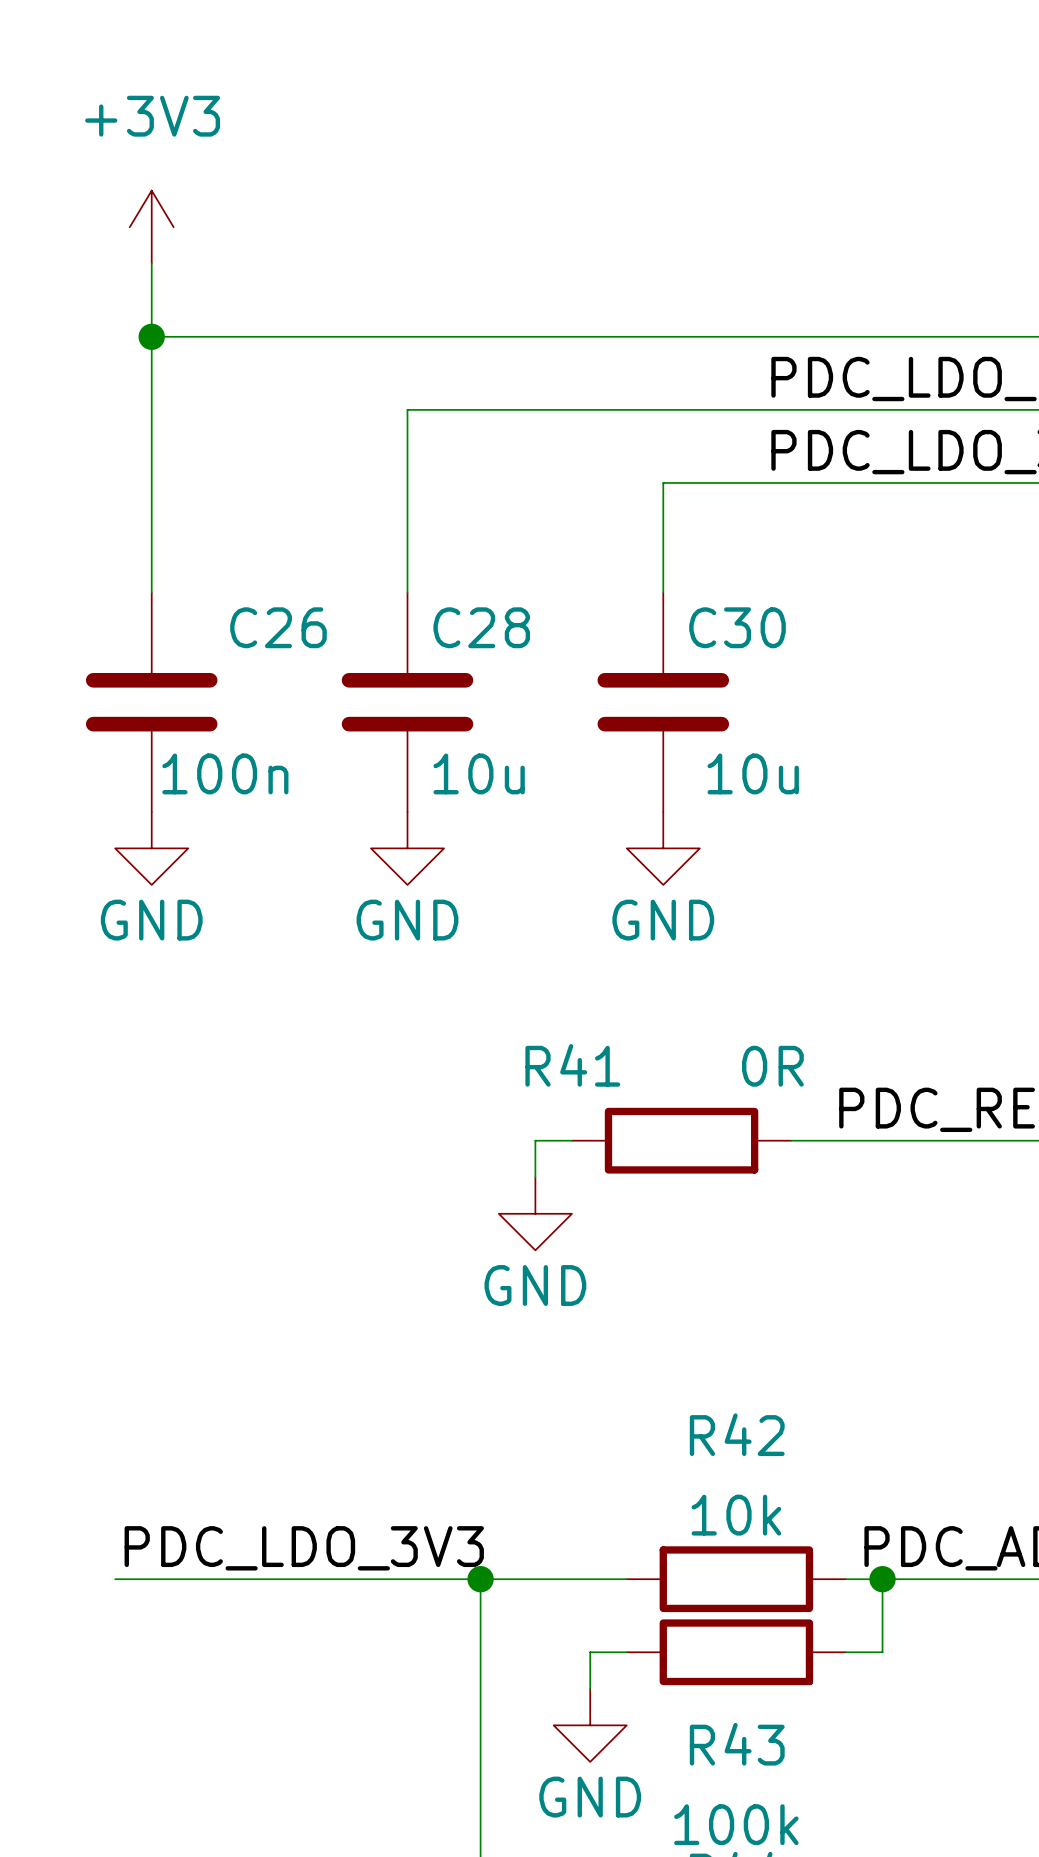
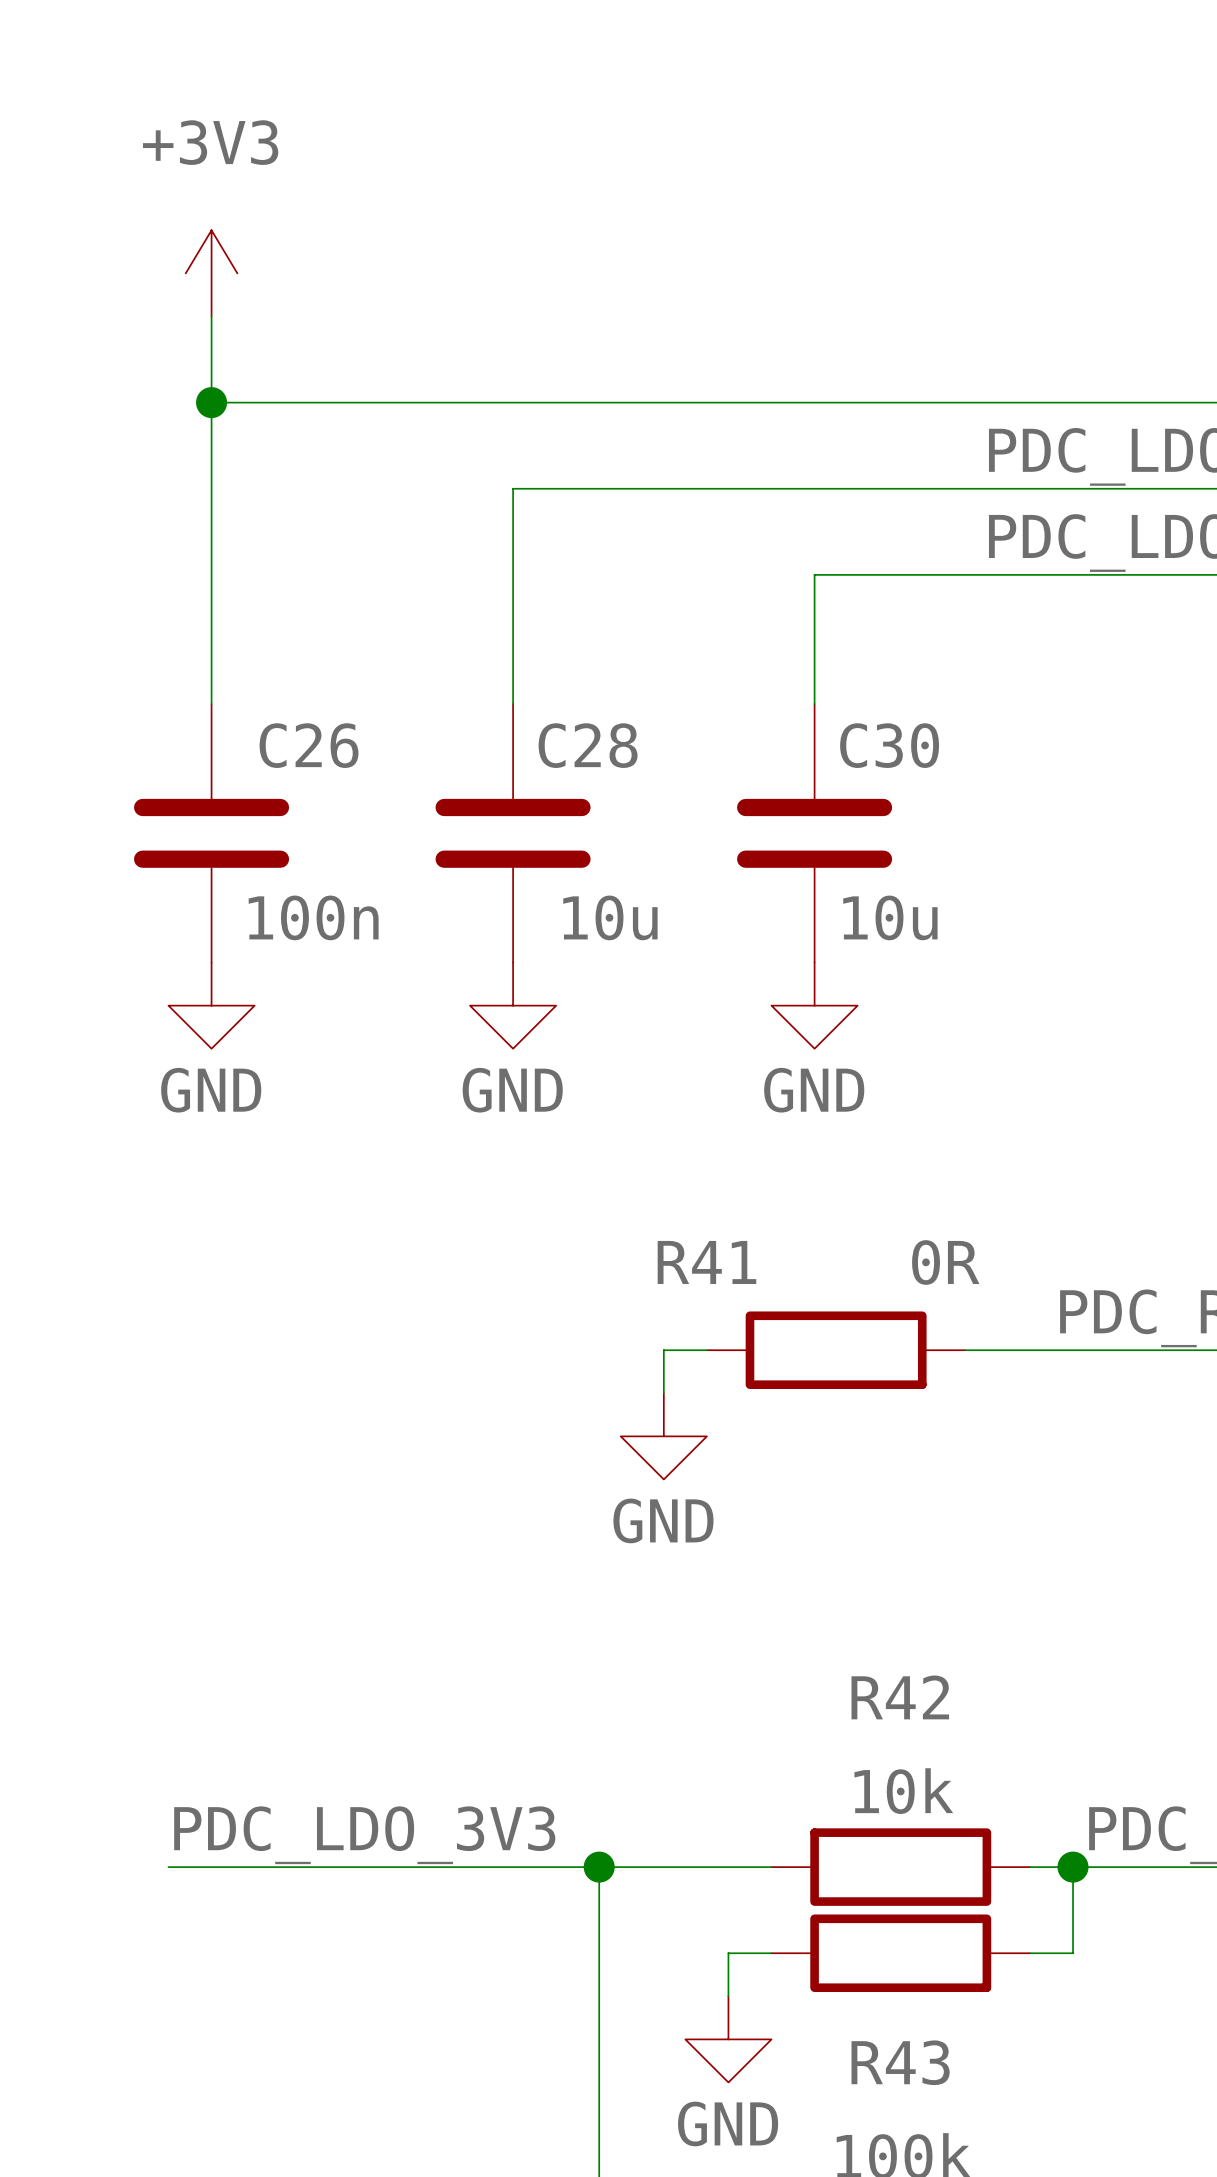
C26 name position: C26 (278, 627) -> C26 (309, 745)
C28 text position: 10u (479, 773) -> 10u (610, 917)
C30 text position: 10u (753, 773) -> 10u (890, 917)

